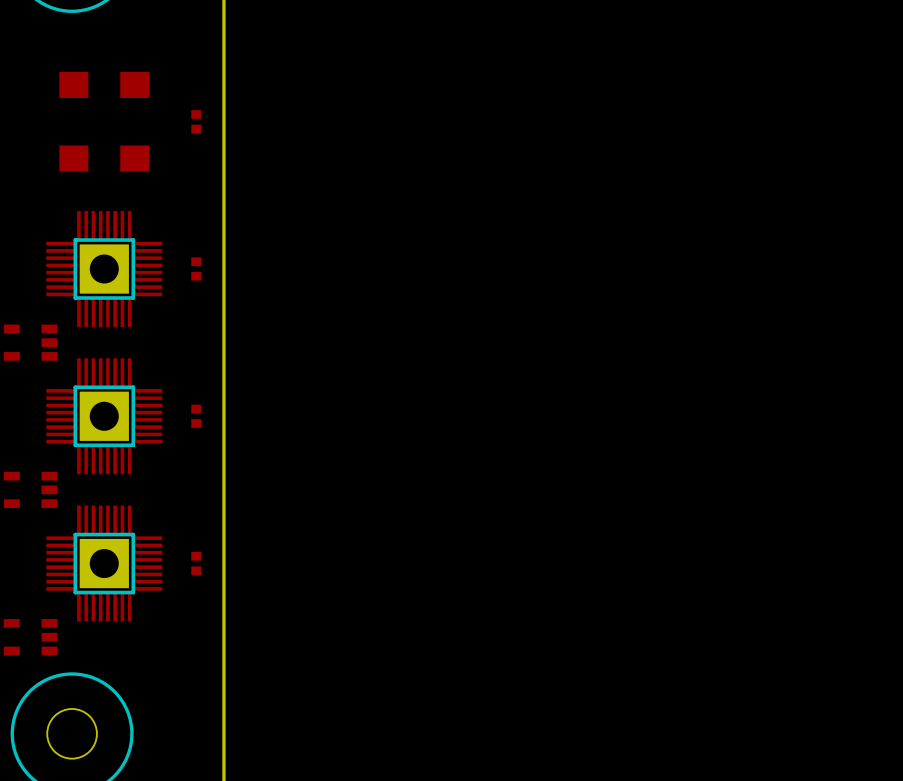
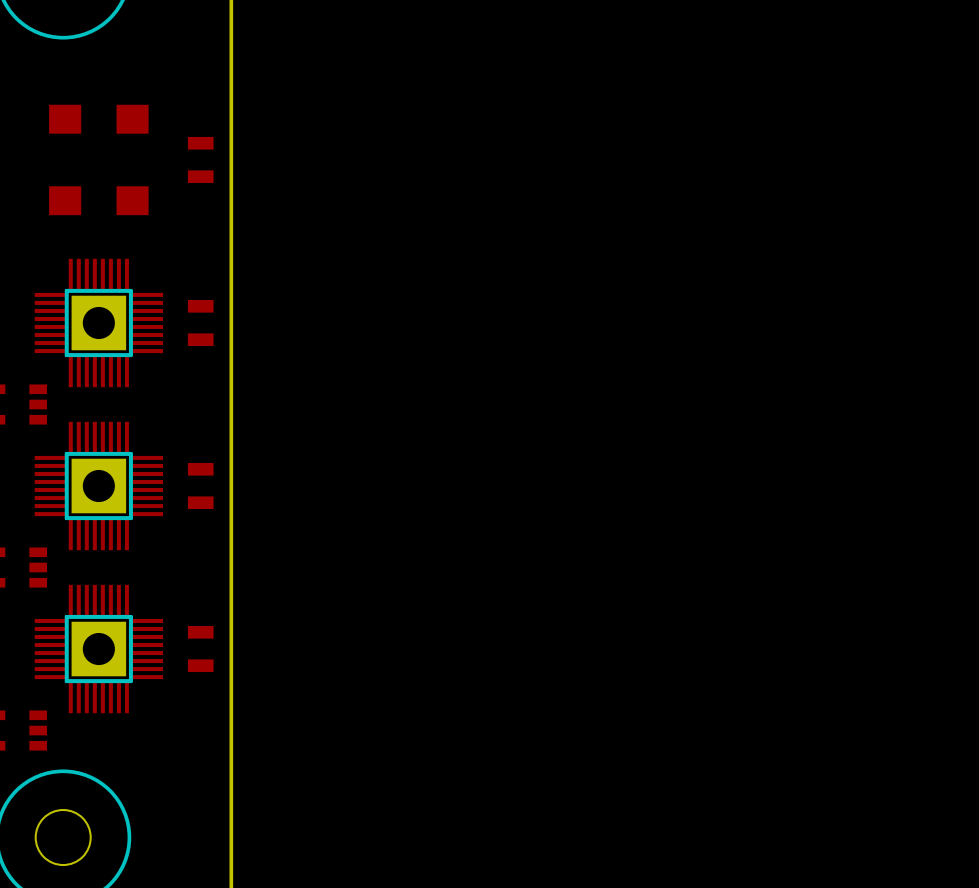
part footprint: [191, 110, 202, 134] -> [187, 136, 214, 184]
part footprint: [191, 257, 202, 281] -> [187, 299, 214, 347]
part footprint: [191, 404, 202, 428] -> [187, 462, 214, 510]
part footprint: [191, 551, 202, 576] -> [187, 626, 214, 673]

